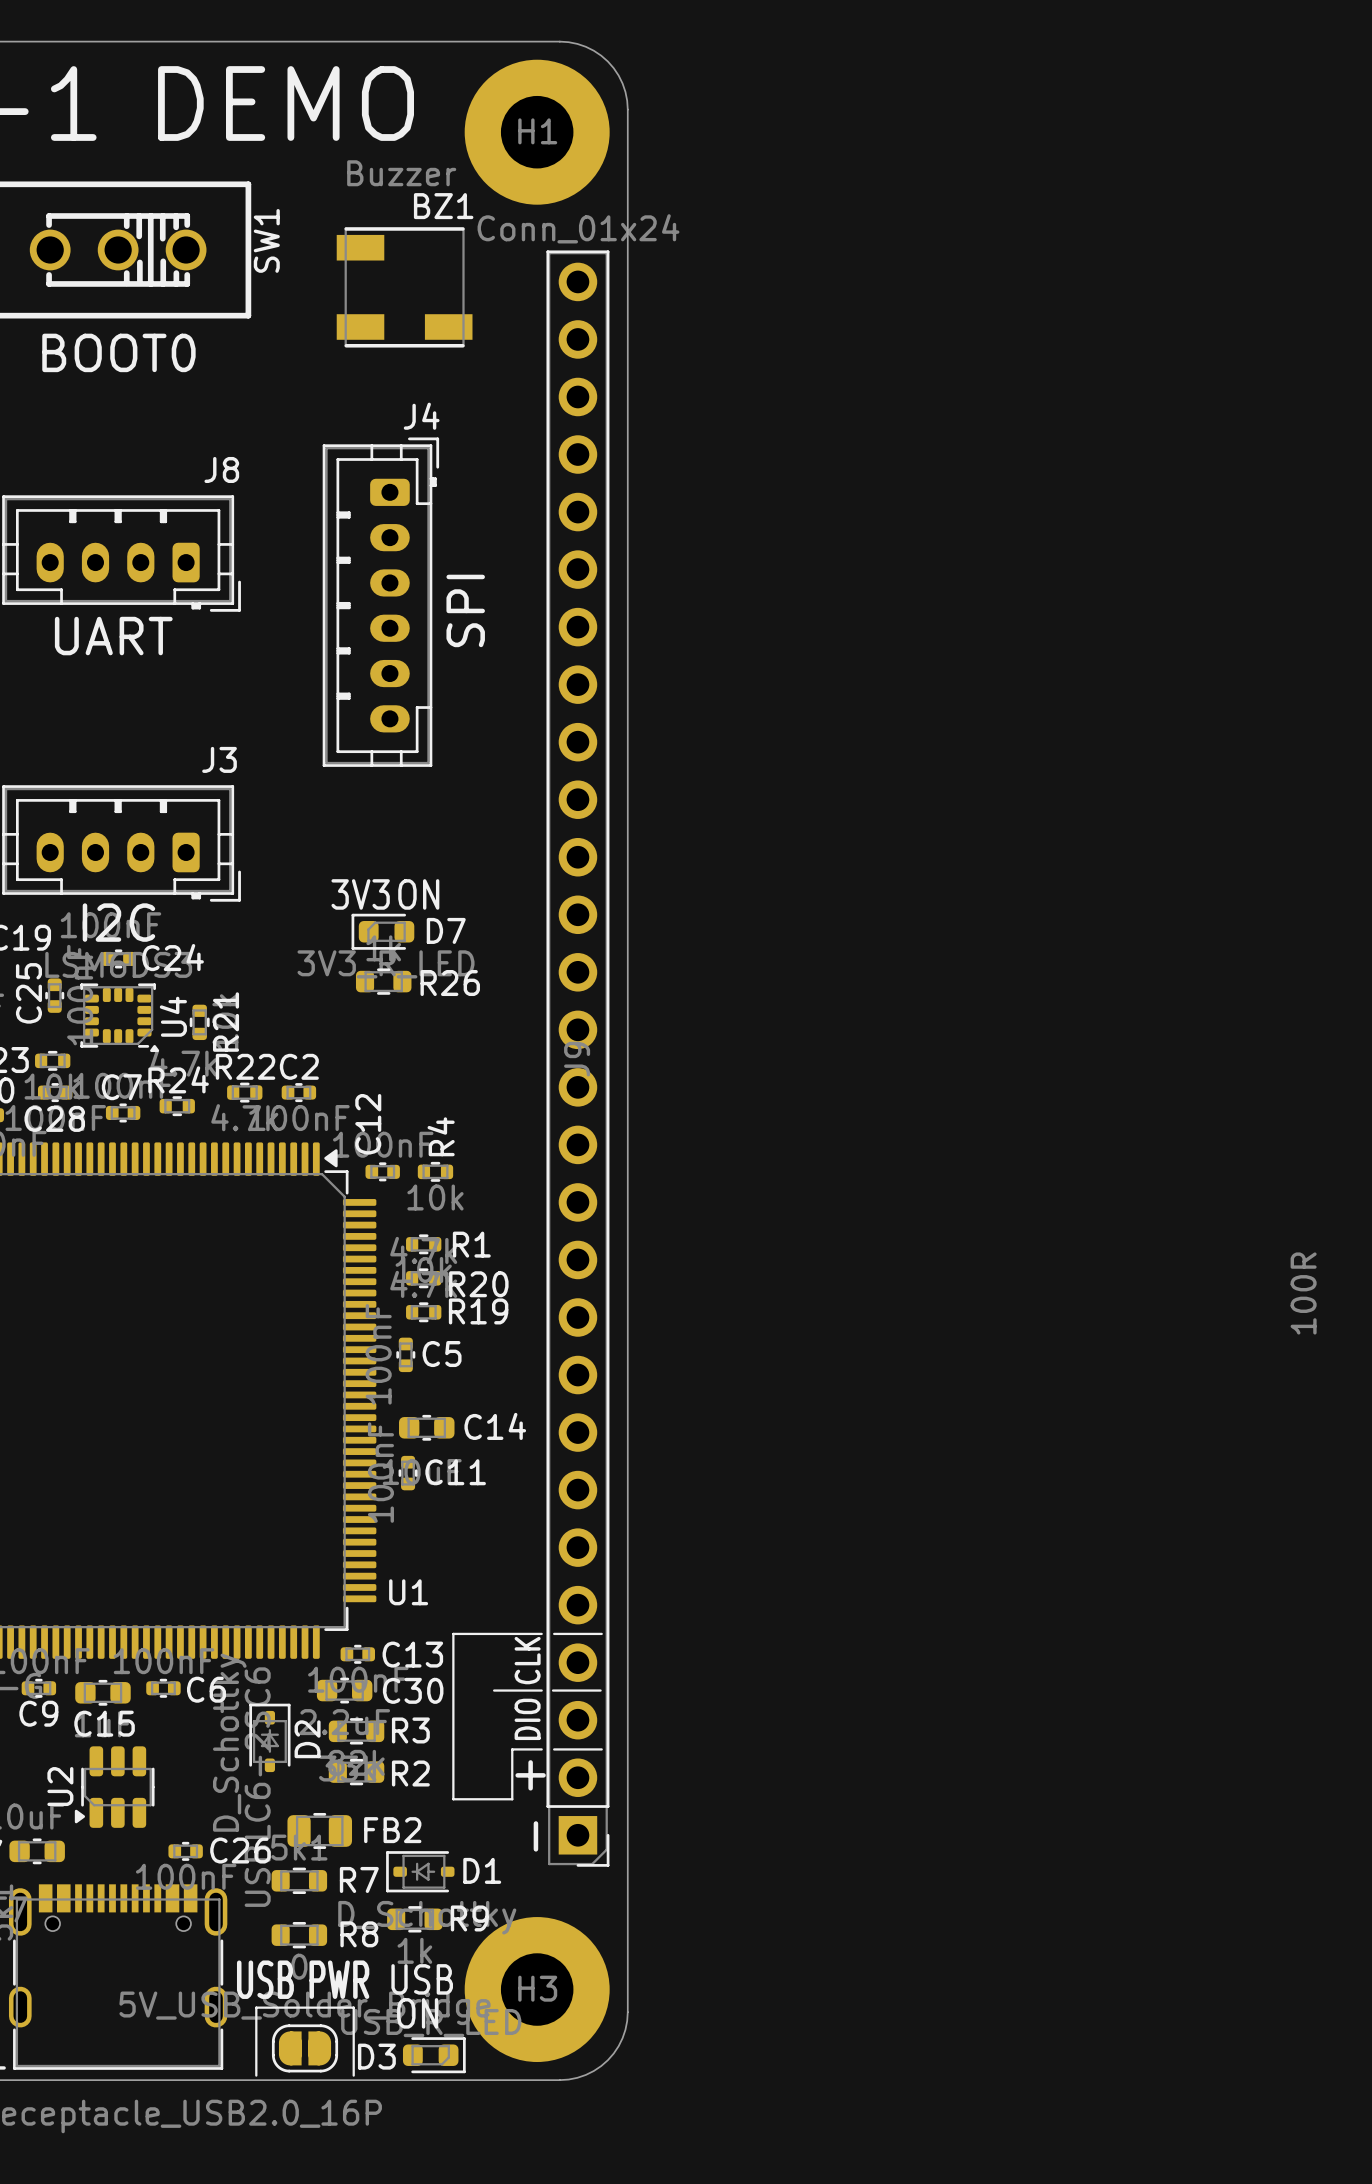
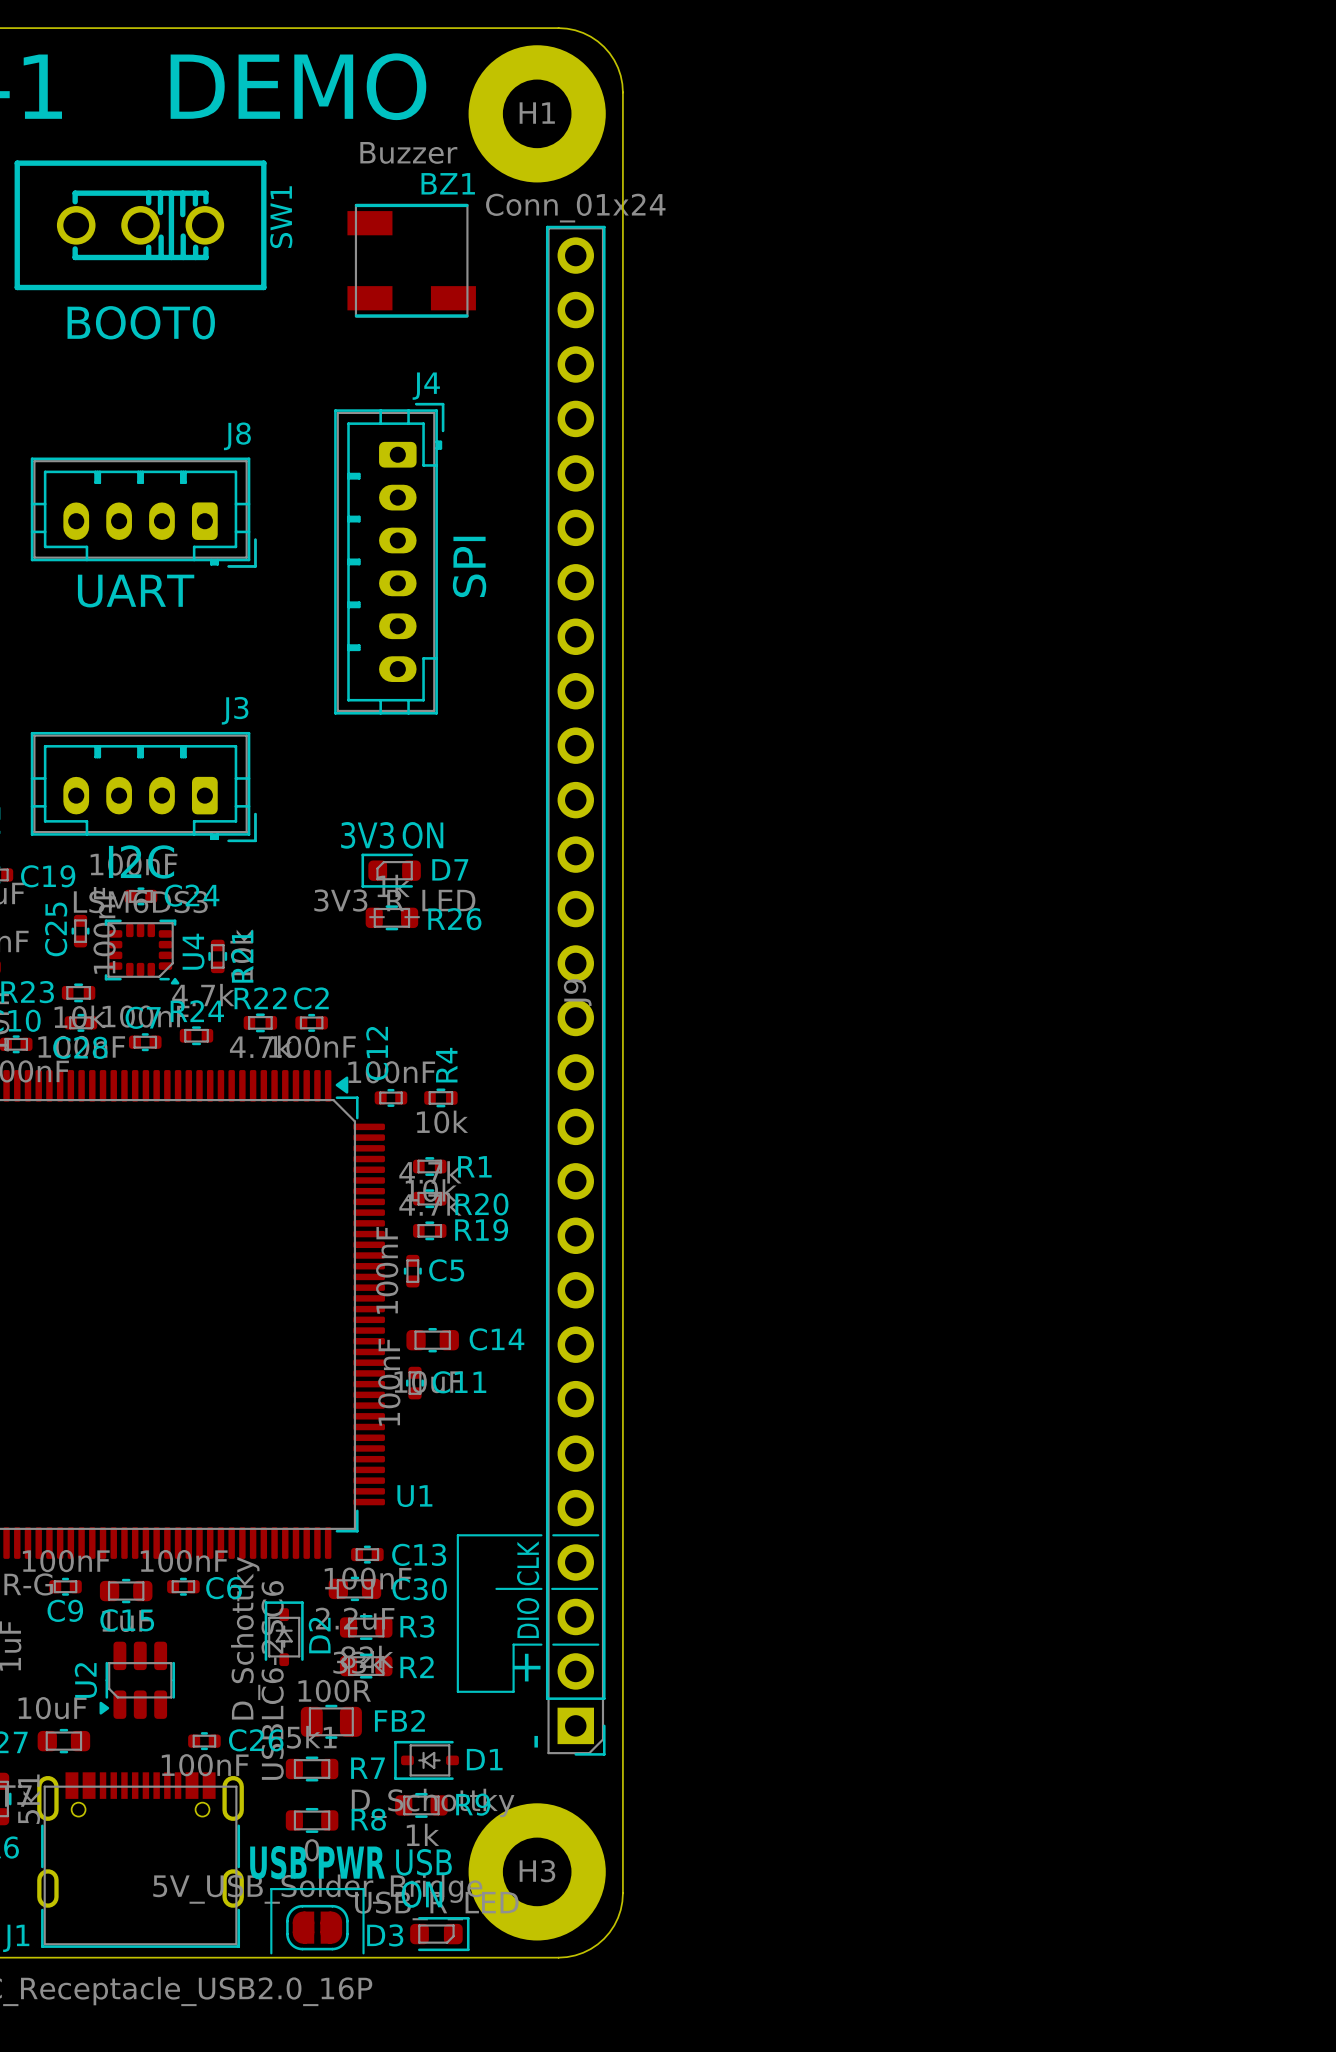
FB2 value rotation: 0° (1303, 1293) -> 90° clockwise (334, 1691)
FB2 value position: 100R (1303, 1293) -> 100R (334, 1691)

